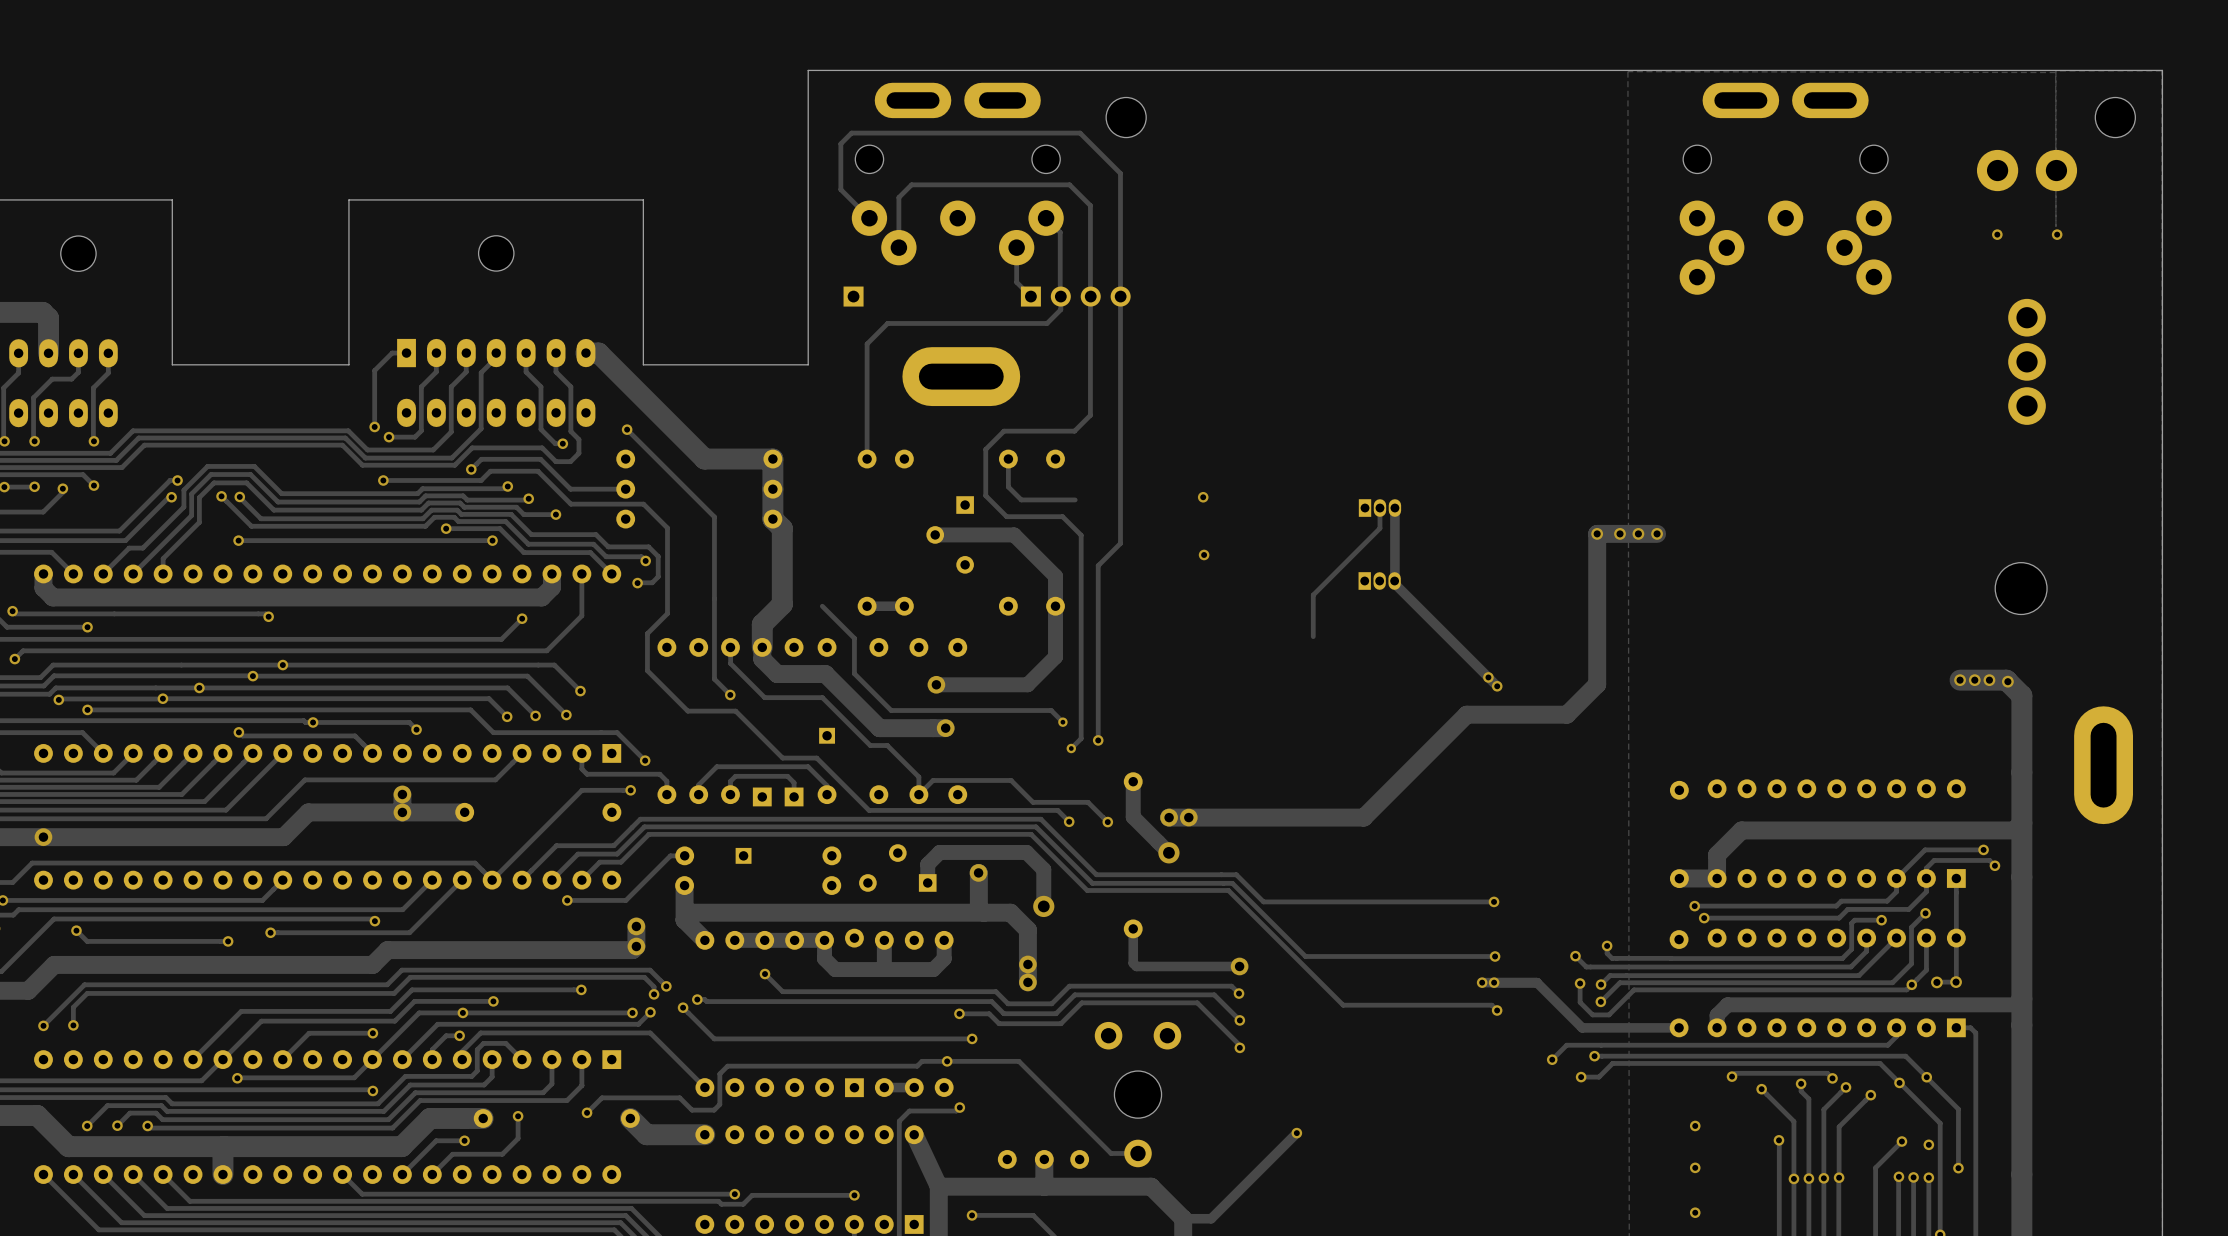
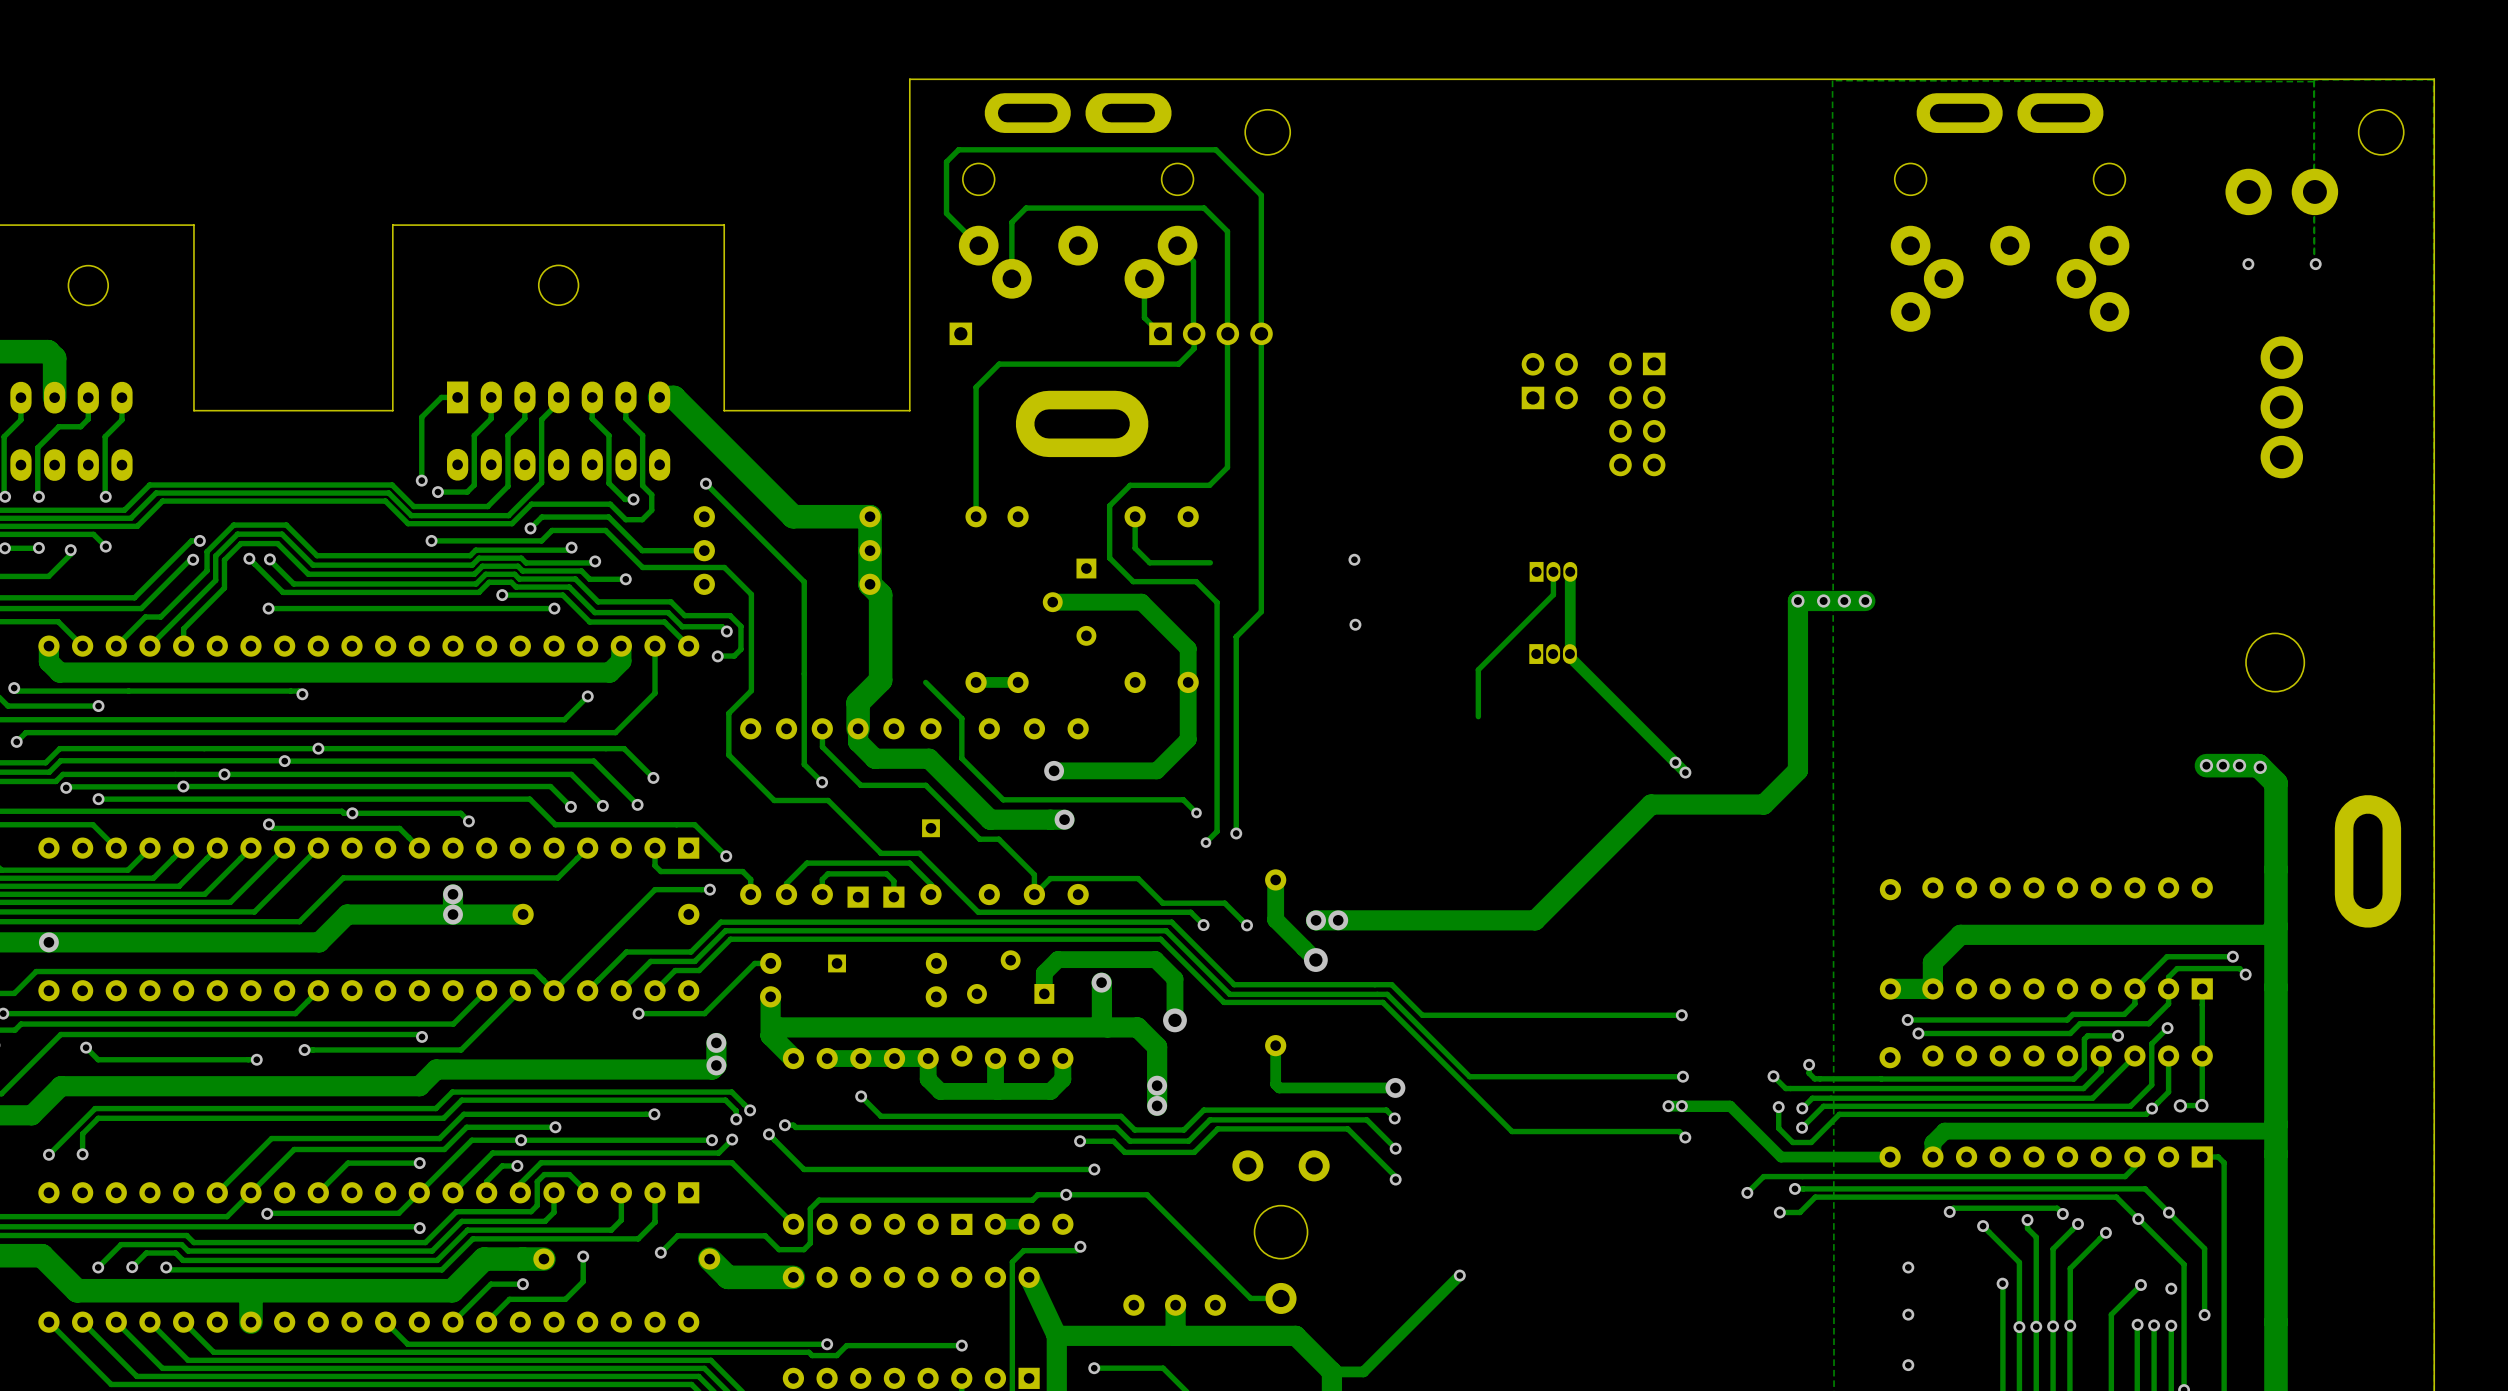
part: none -> (1549, 381)
part: none -> (1637, 414)

